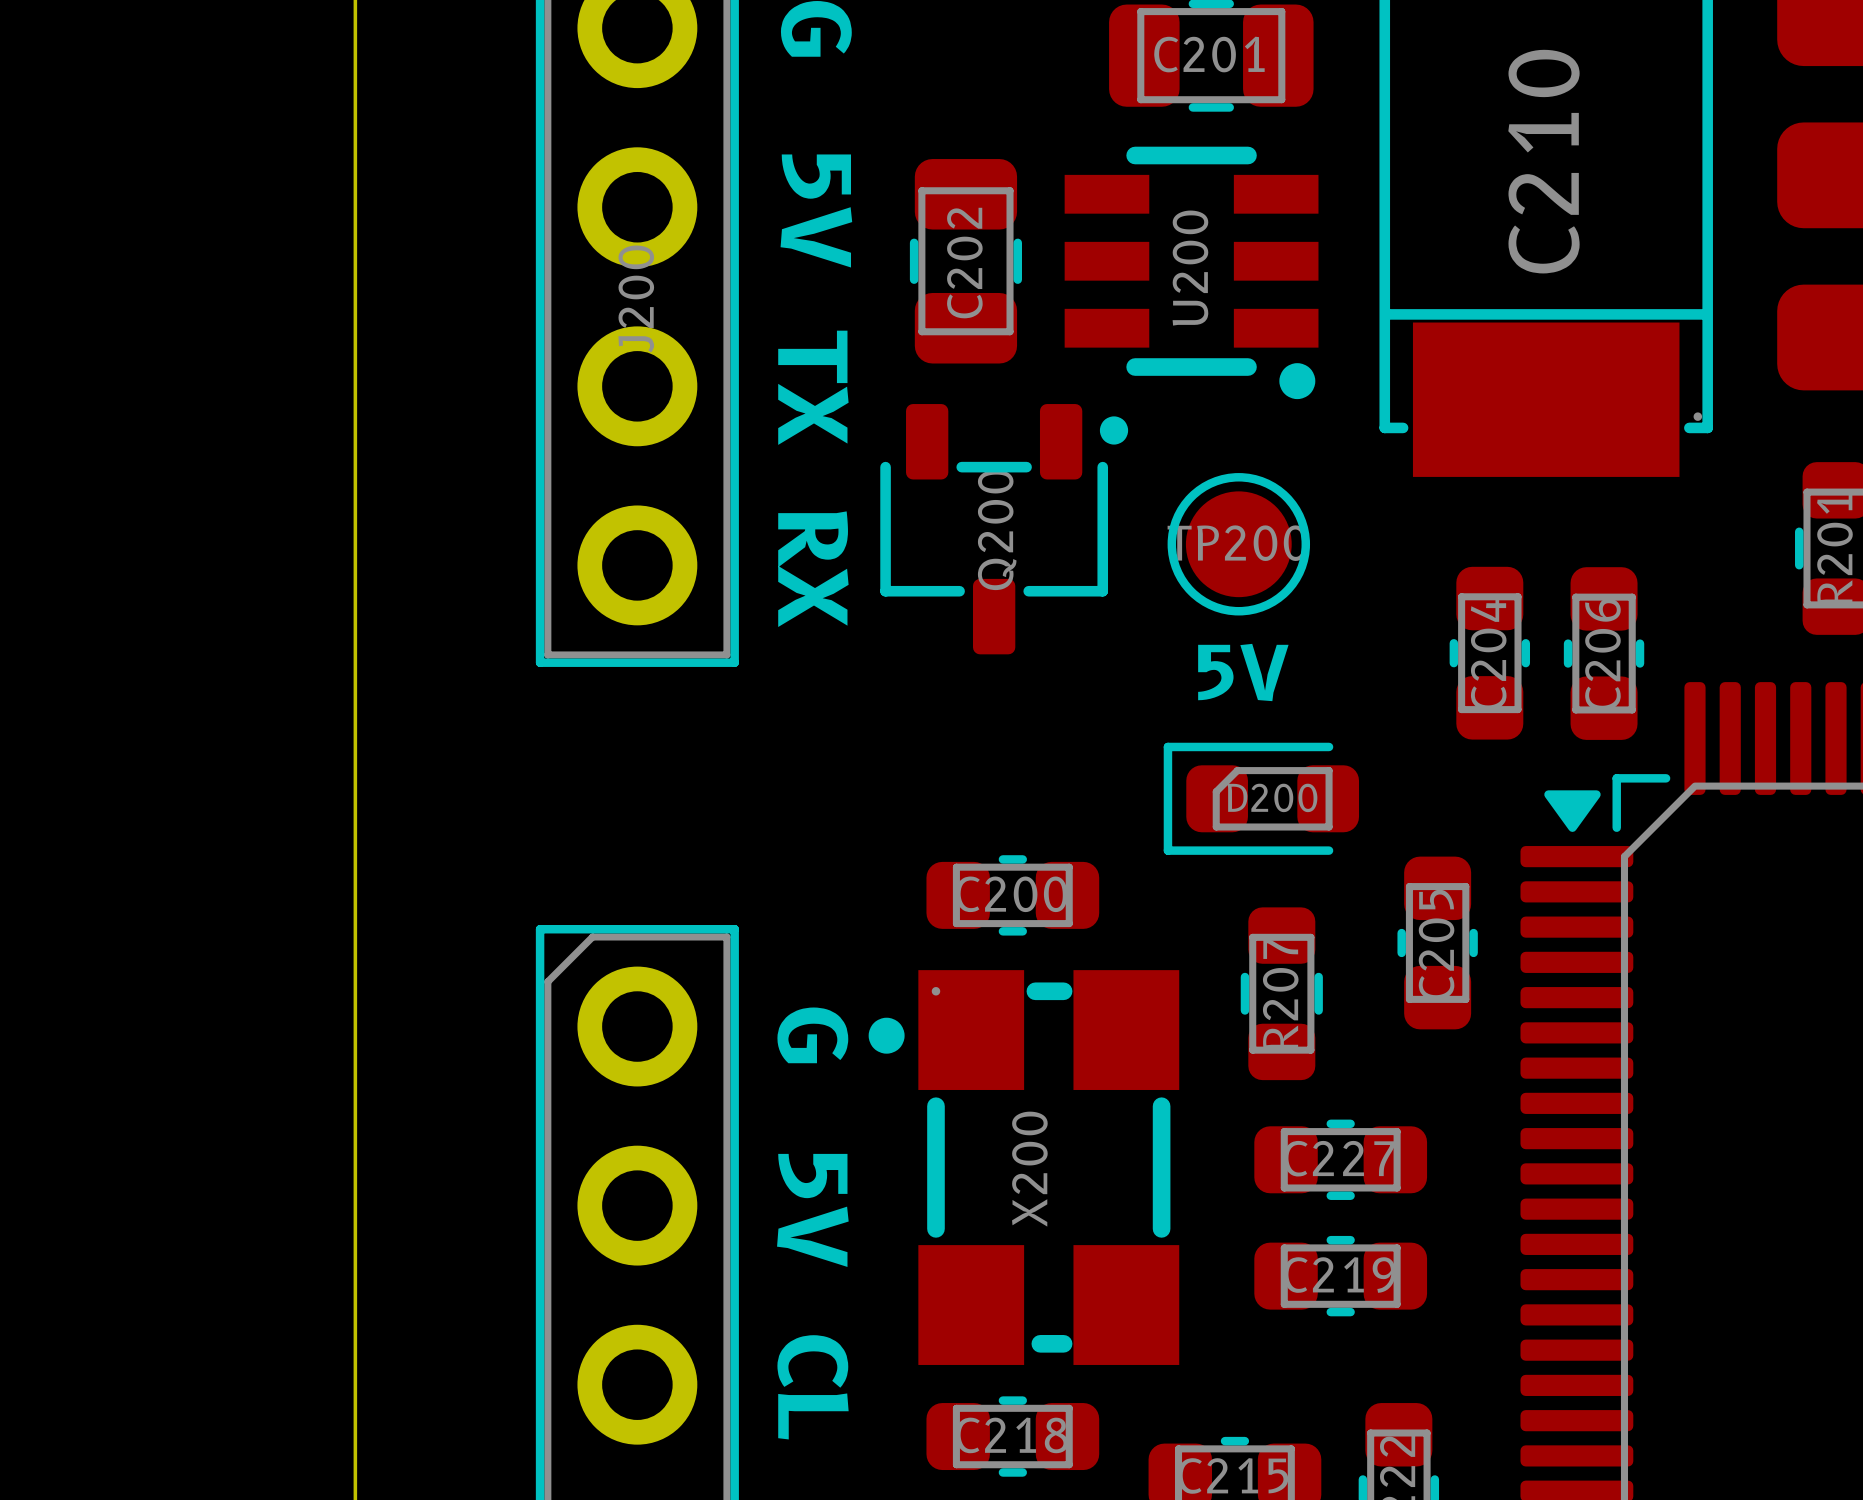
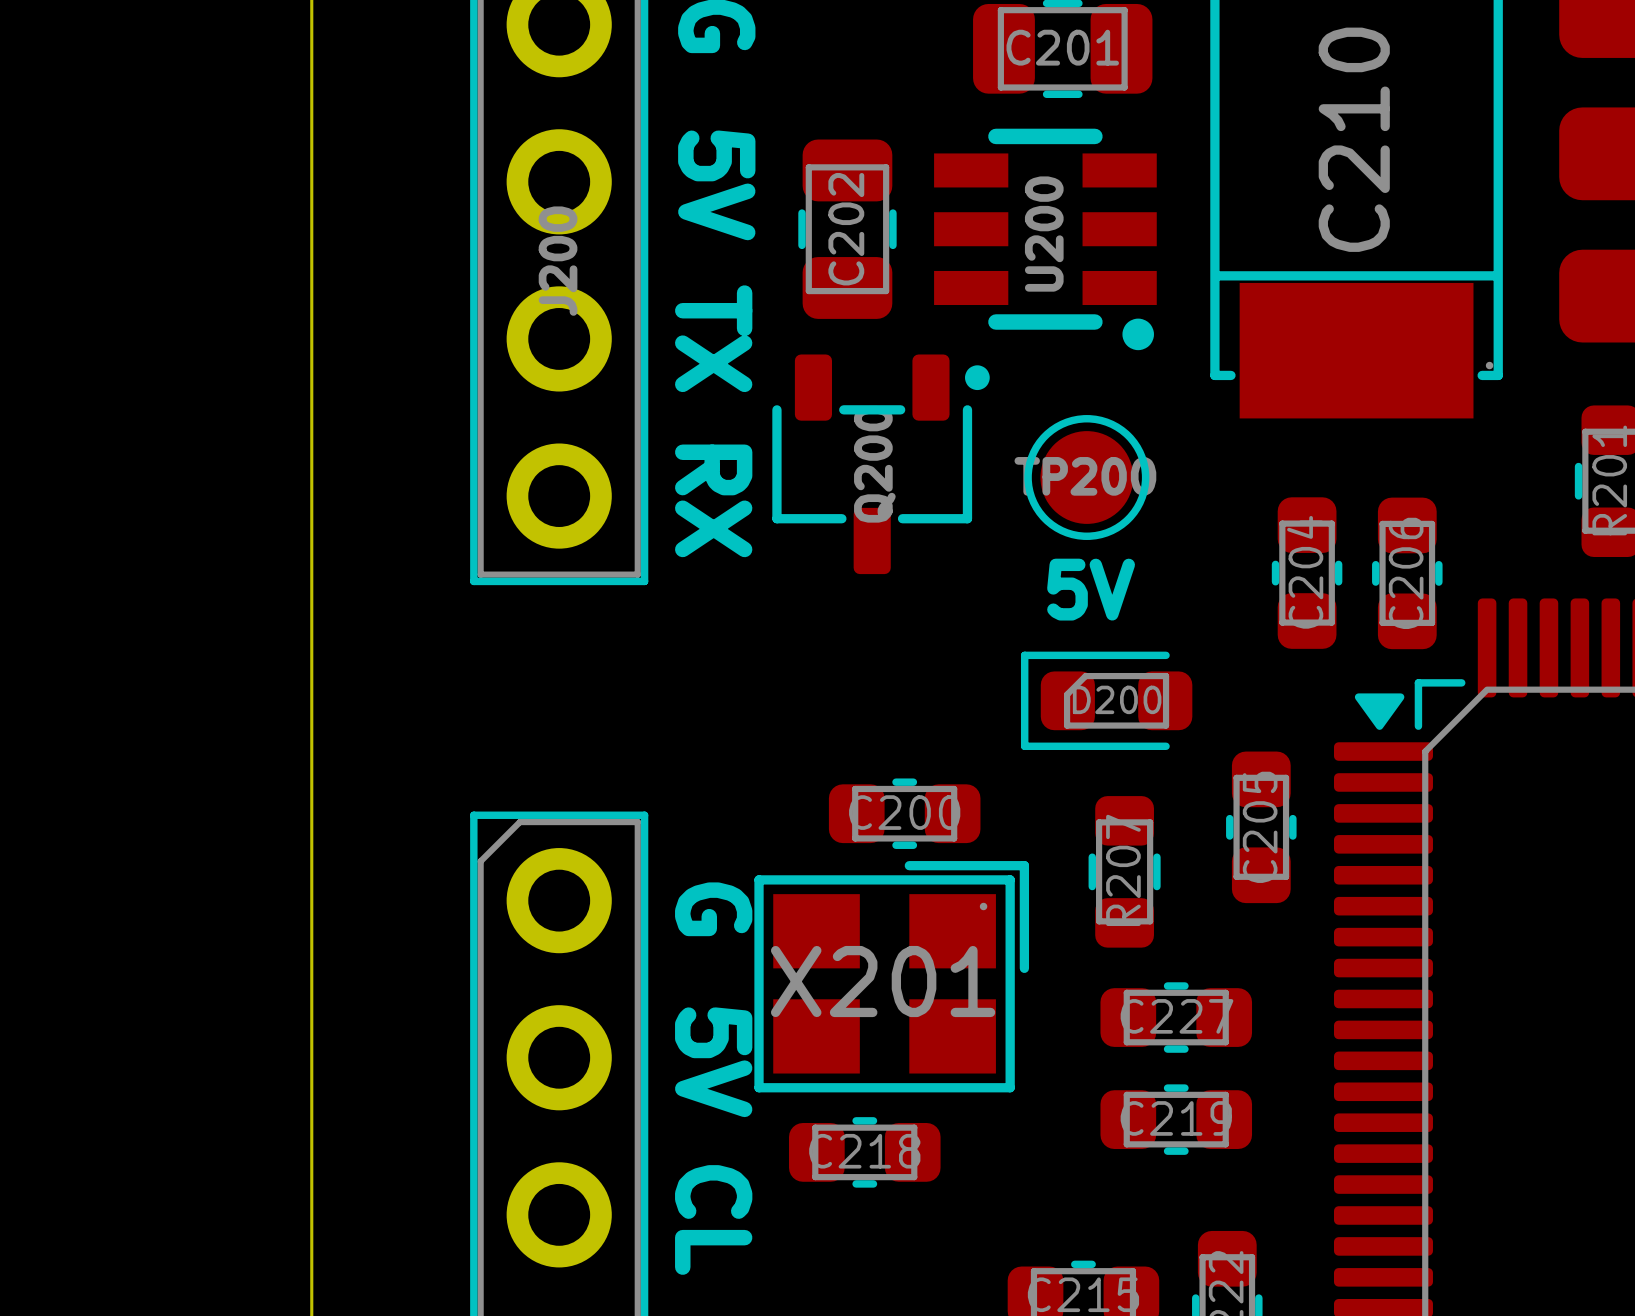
C200 position: (1012, 895) -> (904, 813)
X201: none -> (891, 976)
X200: (1023, 1167) -> none
C218 position: (1012, 1436) -> (864, 1152)

